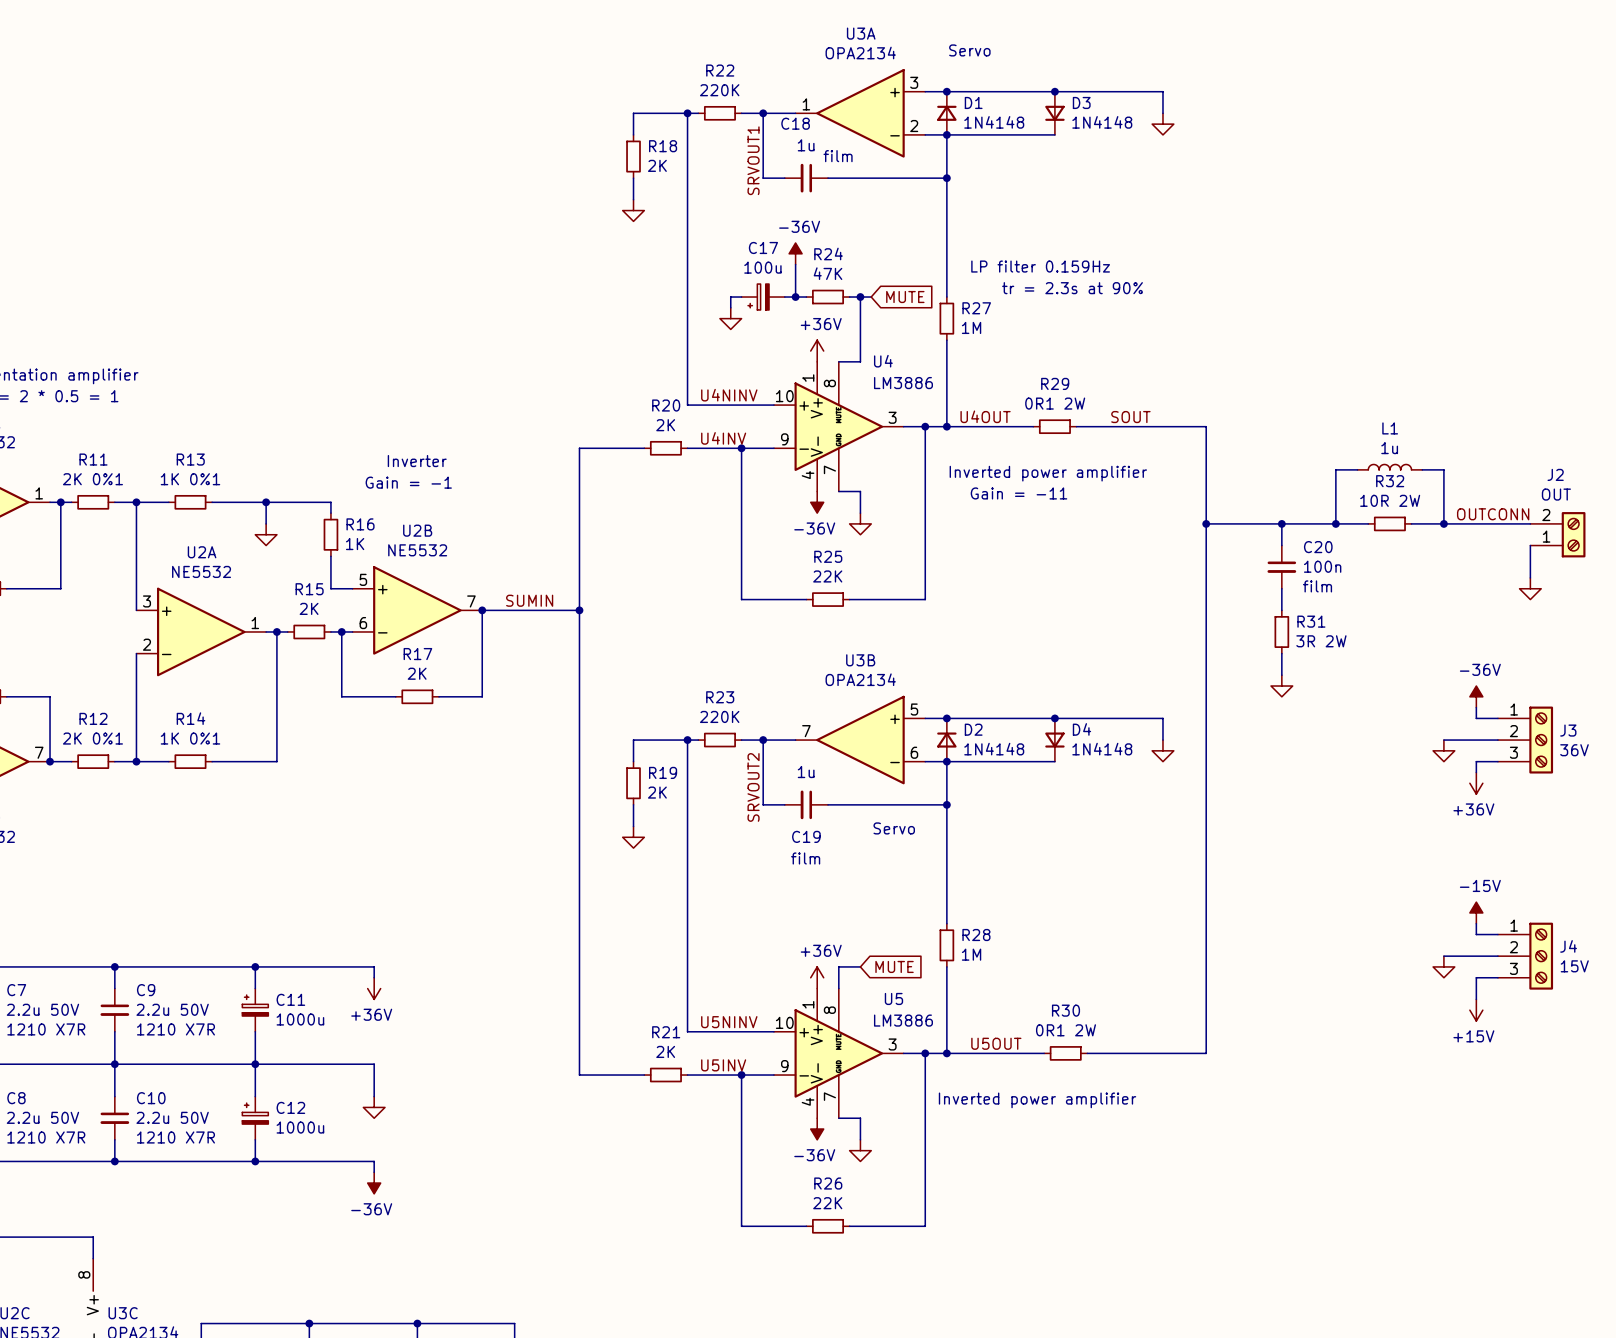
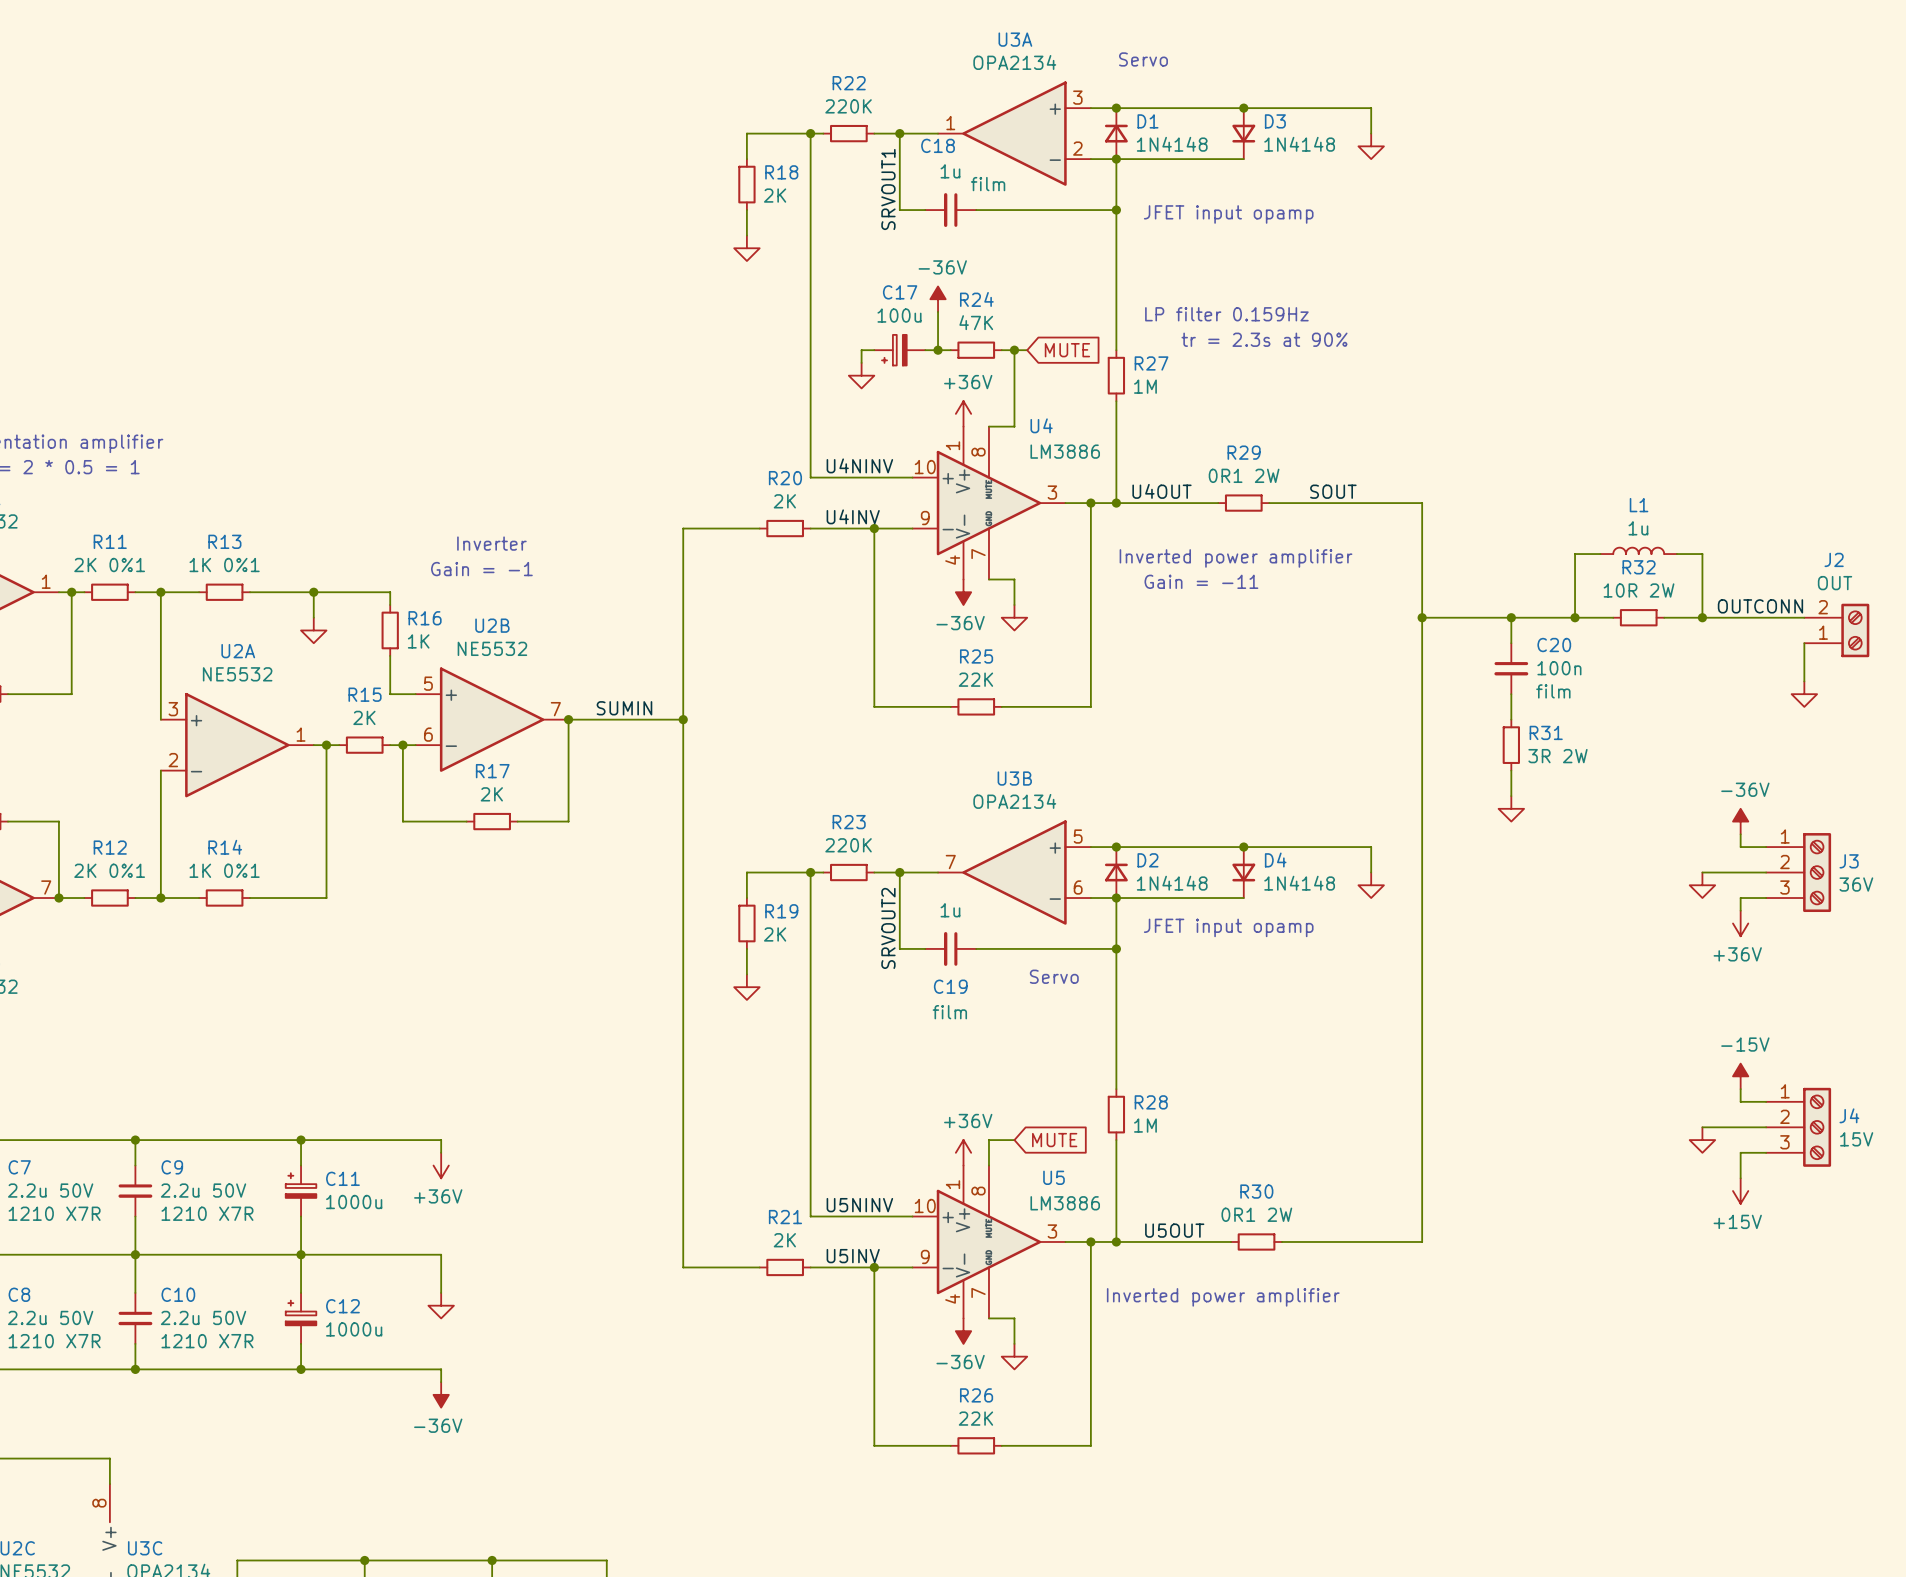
text: none -> JFET input opamp (1228, 214)
text: none -> JFET input opamp (1228, 927)

